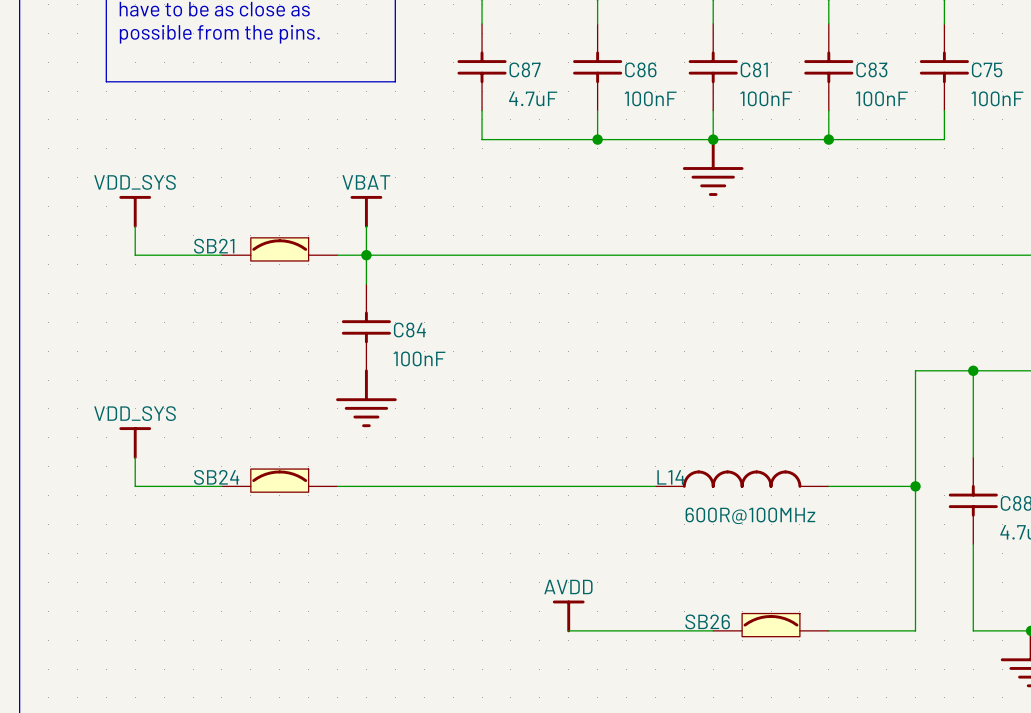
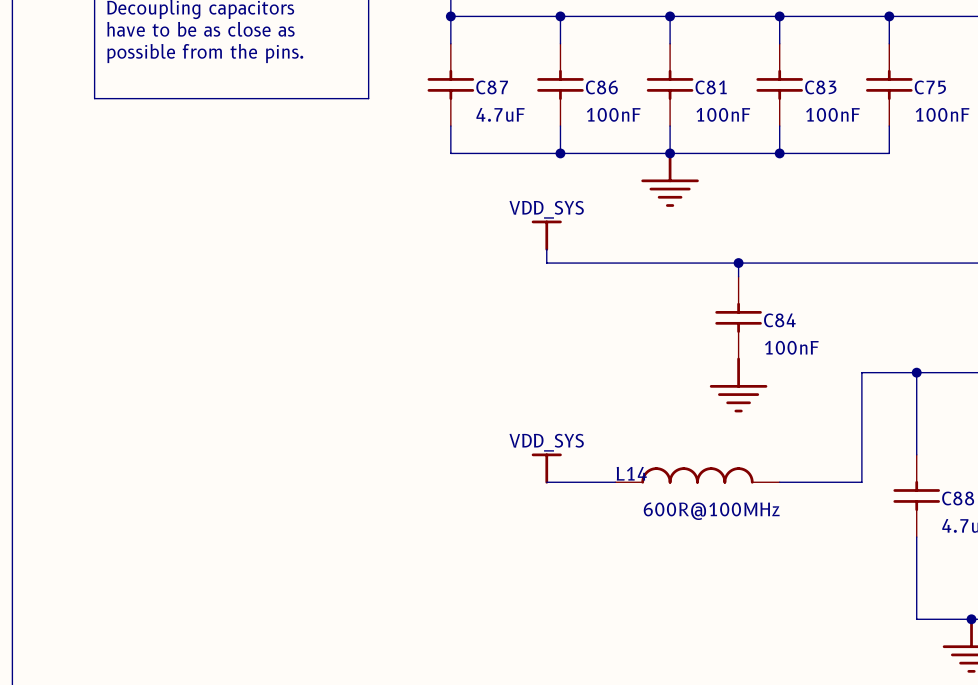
power symbol: VDD_SYS (135, 211) -> none
power symbol: VBAT (366, 211) -> none
wire: (135, 226) (135, 255) (221, 255) -> none
wire: (366, 226) (366, 284) -> none
power symbol: none -> VDD_SYS (546, 235)
SB21: (279, 249) -> none
wire: (337, 255) (583, 255) -> (546, 249) (546, 263)
junction: (366, 255) -> none
wire: none -> (738, 263) (738, 276)
junction: none -> (738, 263)
C84 position: (366, 327) -> (738, 317)
power symbol: none -> (738, 384)
power symbol: (366, 398) -> none
power symbol: VDD_SYS (135, 443) -> none
wire: (135, 457) (135, 486) (221, 486) -> none
power symbol: none -> VDD_SYS (546, 468)
SB24: (279, 480) -> none
wire: (337, 486) (583, 486) -> none
wire: (915, 486) (915, 630) (828, 630) -> none
junction: (915, 486) -> none
power symbol: AVDD (568, 616) -> none
SB26: (771, 625) -> none
wire: (568, 630) (713, 630) -> none

